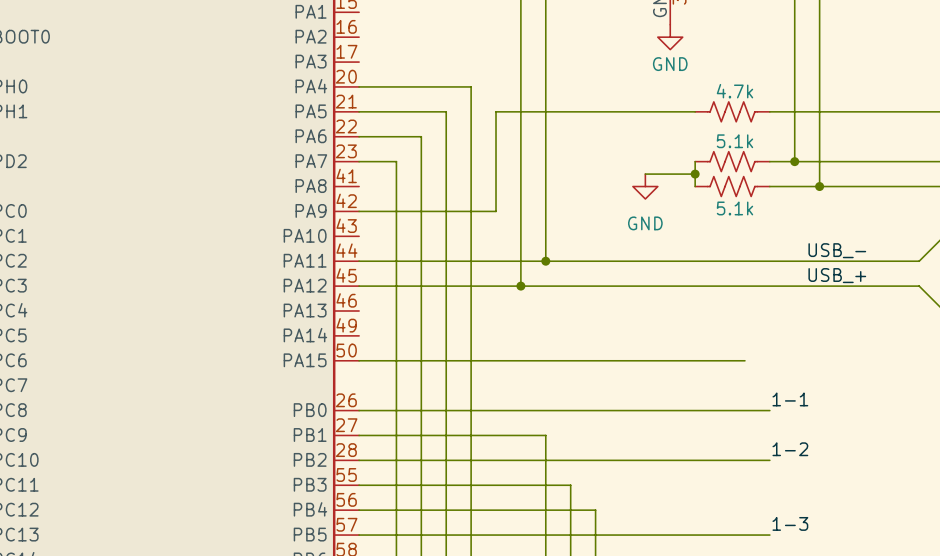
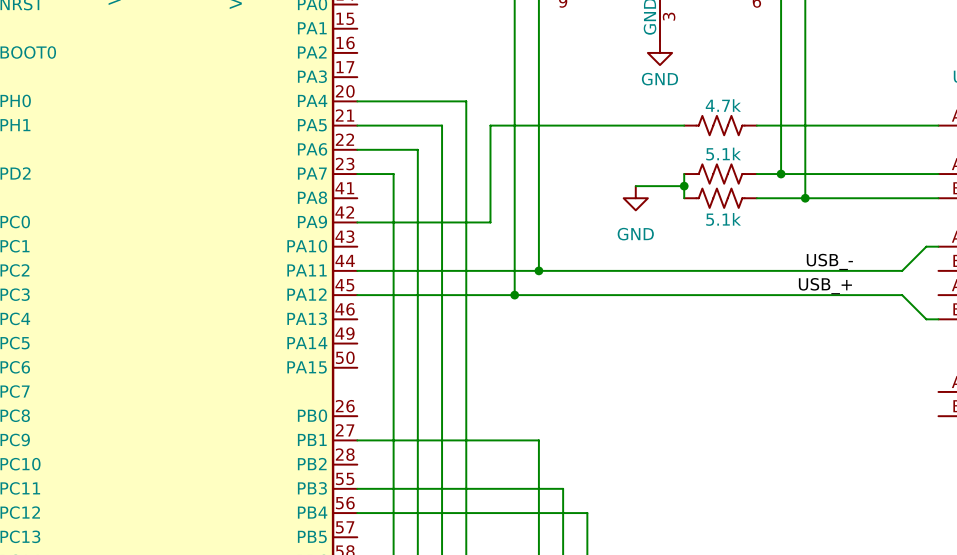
wire: (359, 360) (744, 360) -> none
label: 1-1 (790, 399) -> none
wire: (359, 410) (769, 410) -> none
label: 1-2 (790, 449) -> none
wire: (359, 460) (769, 460) -> none
label: 1-3 (790, 523) -> none
wire: (359, 535) (769, 535) -> none

